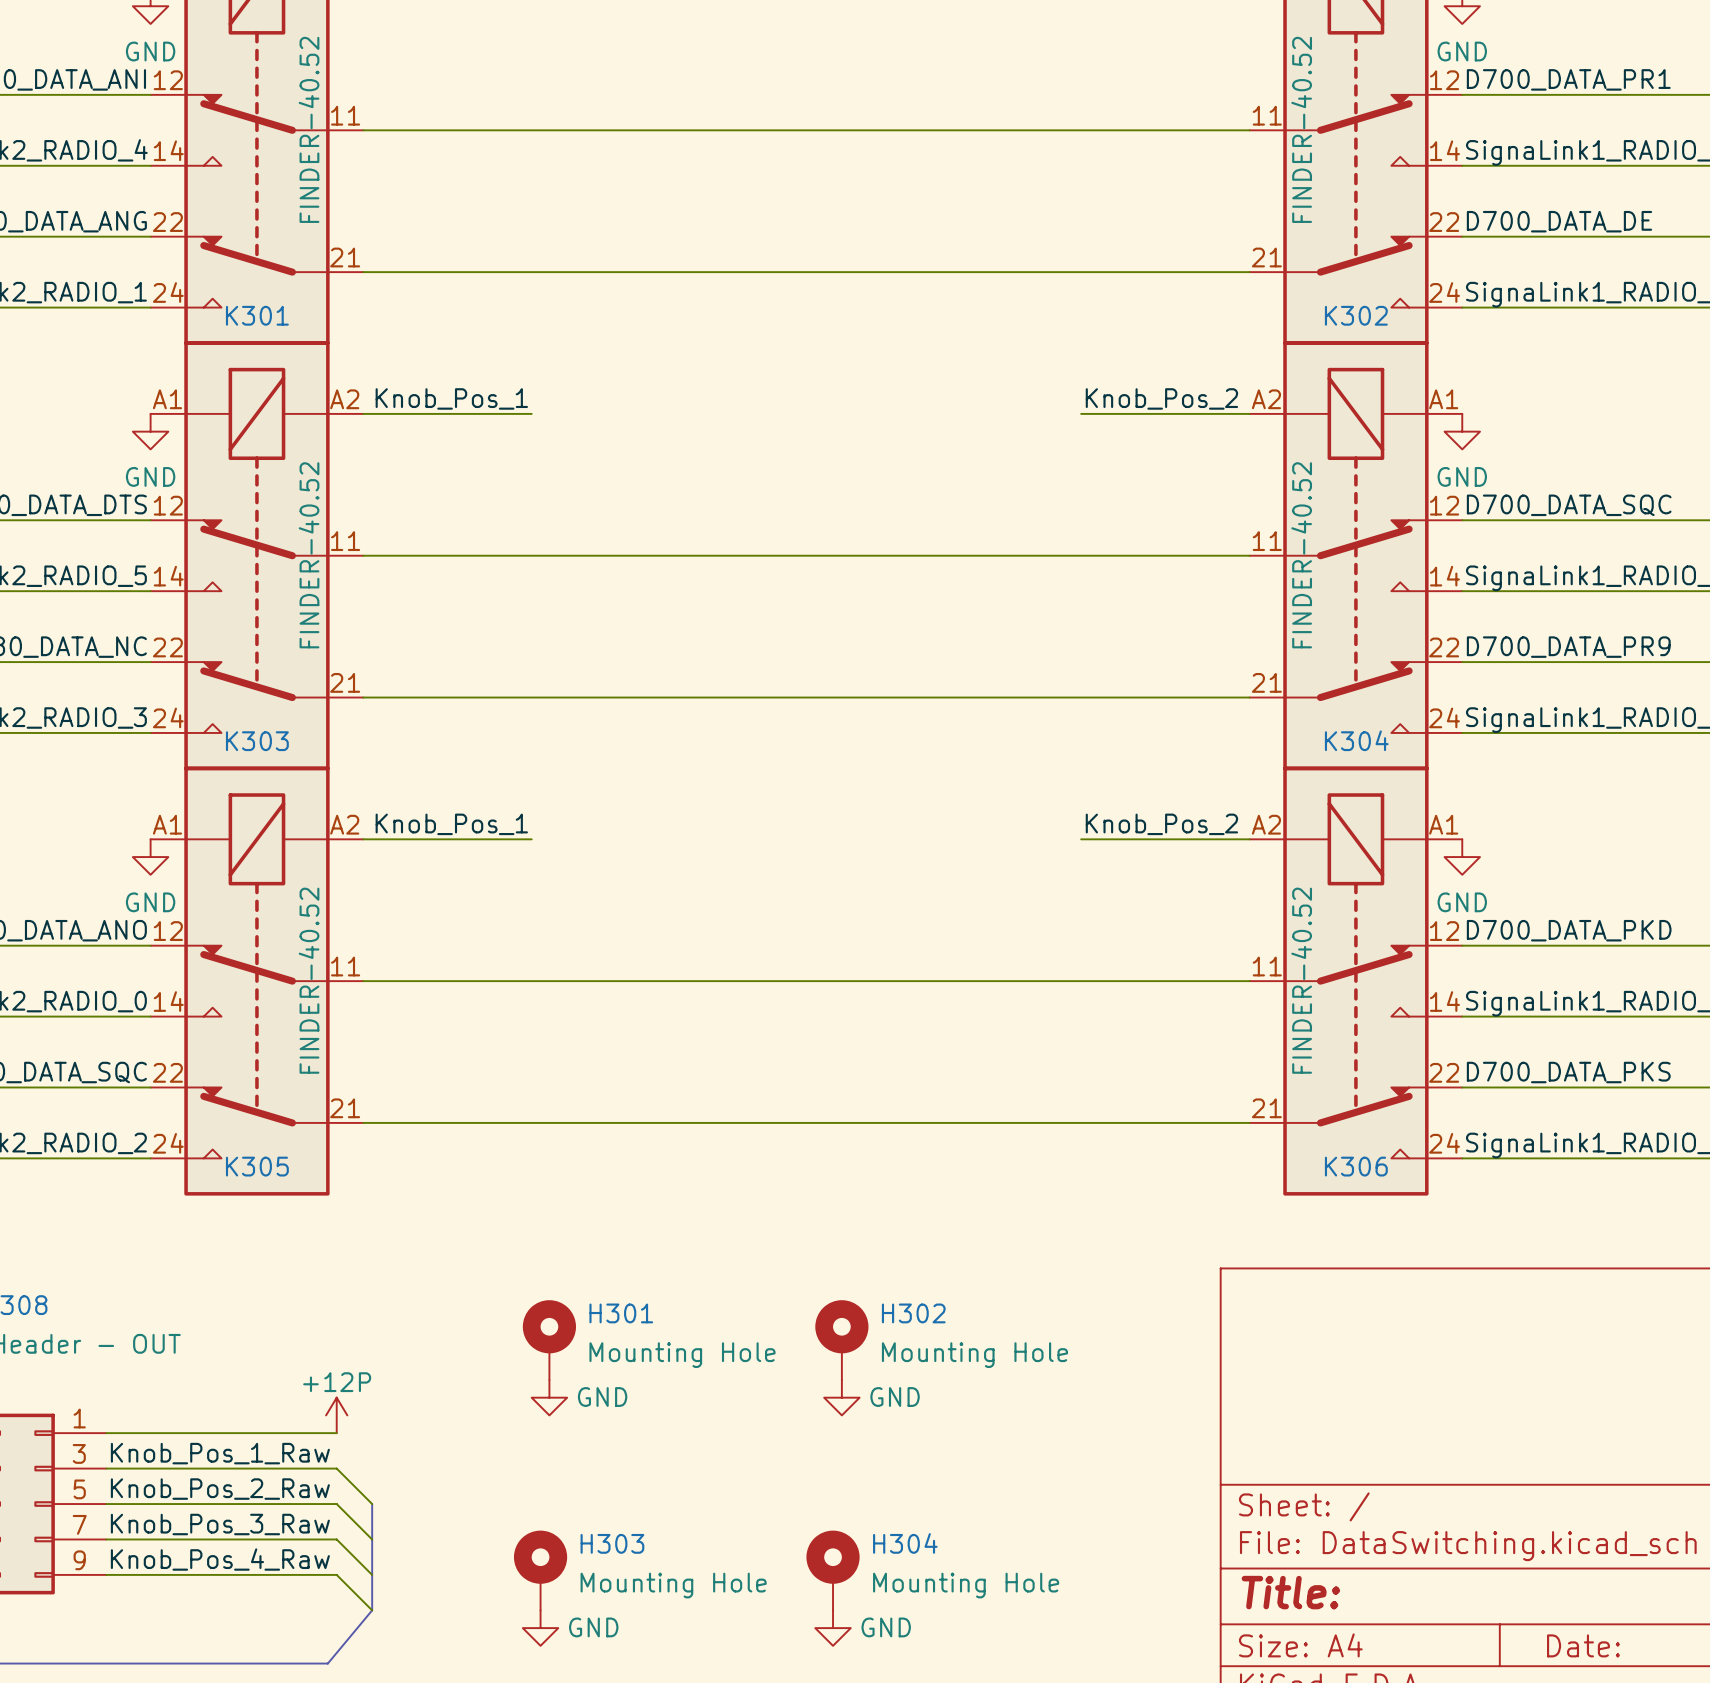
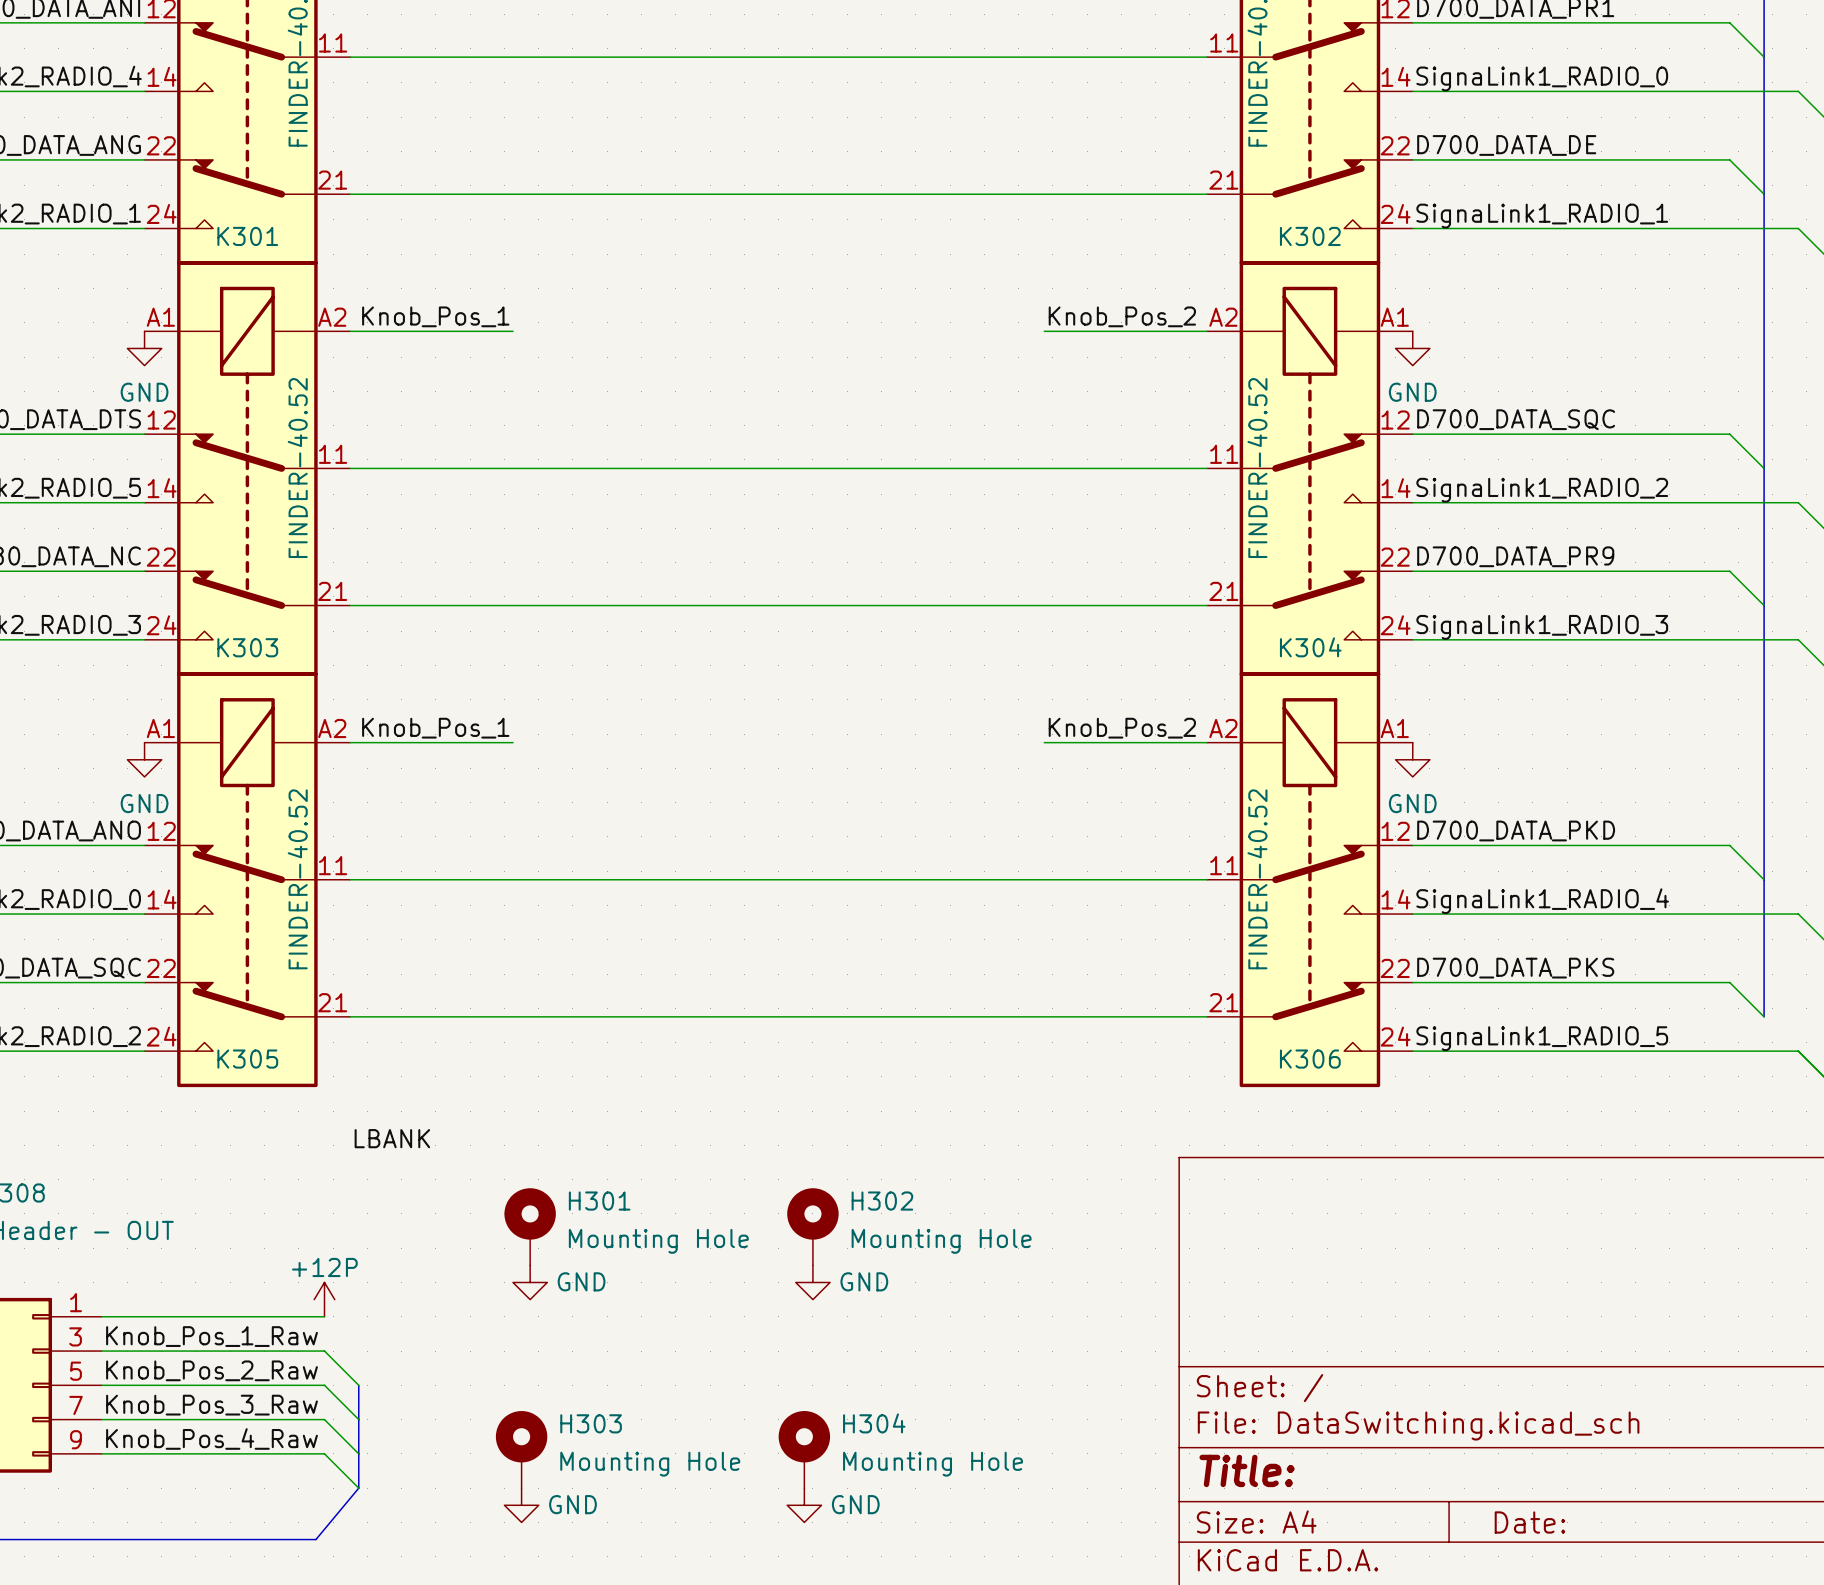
label: none -> LBANK (392, 1138)

